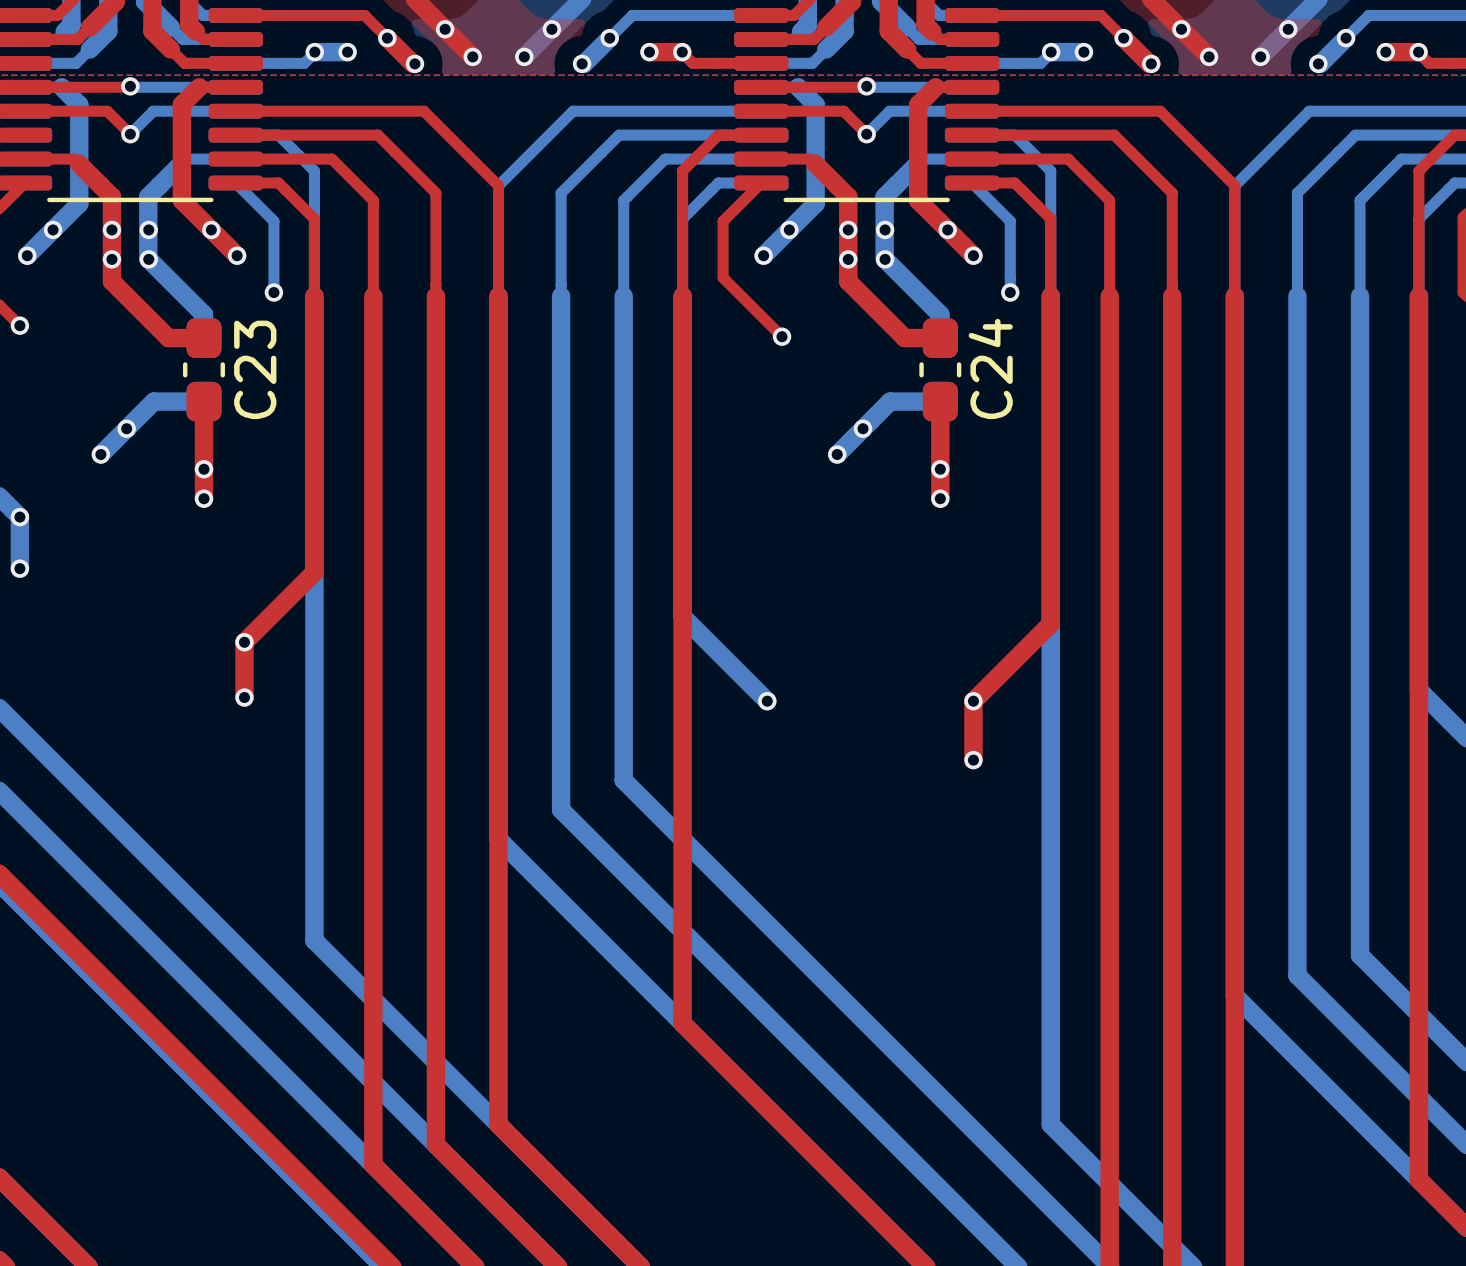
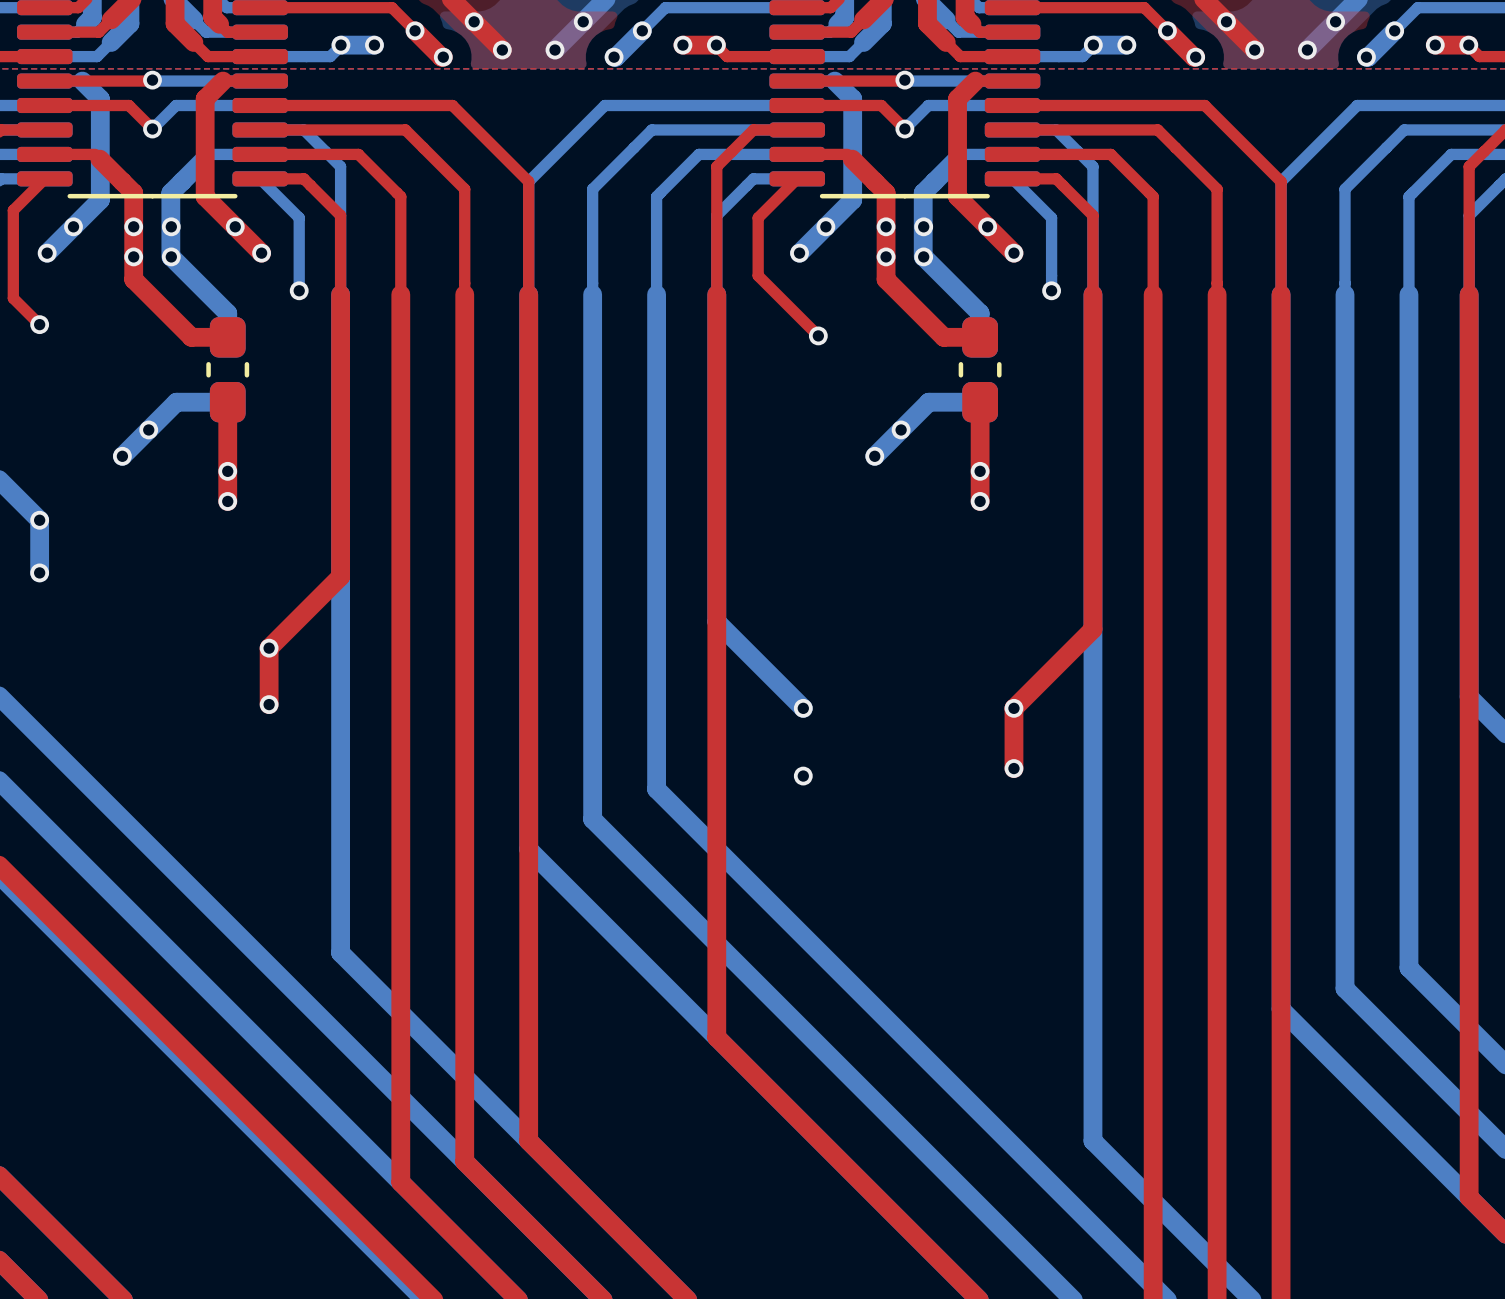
C24 name: C24 (990, 368) -> none
C23 name: C23 (255, 369) -> none
via: none -> (803, 776)

